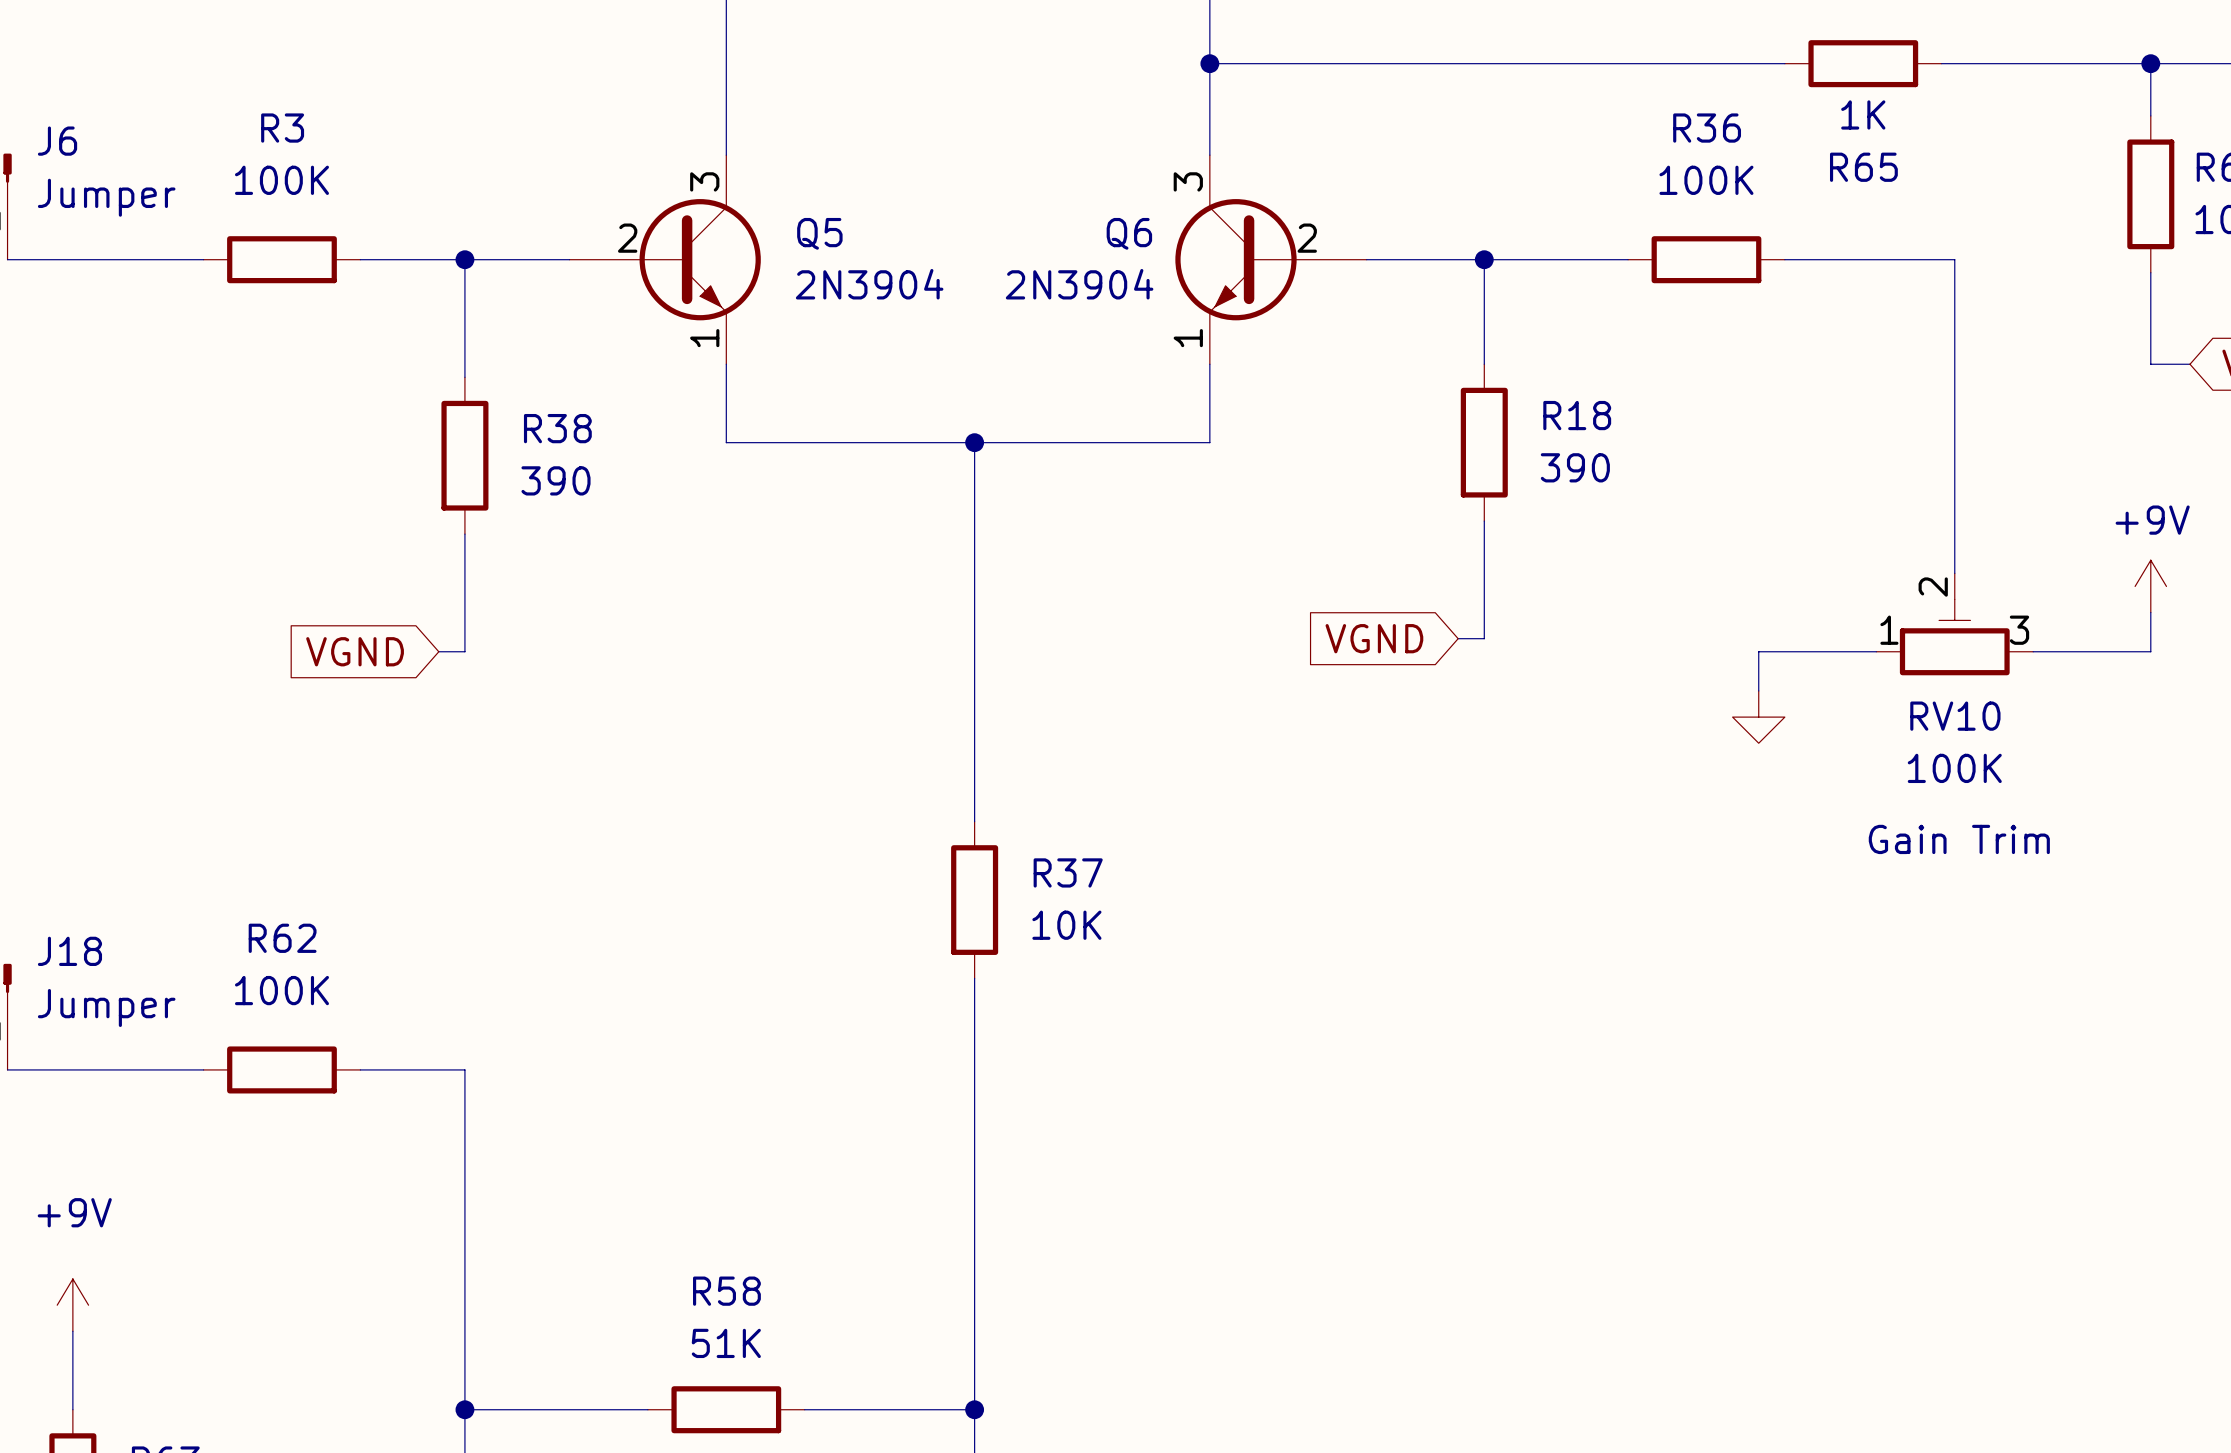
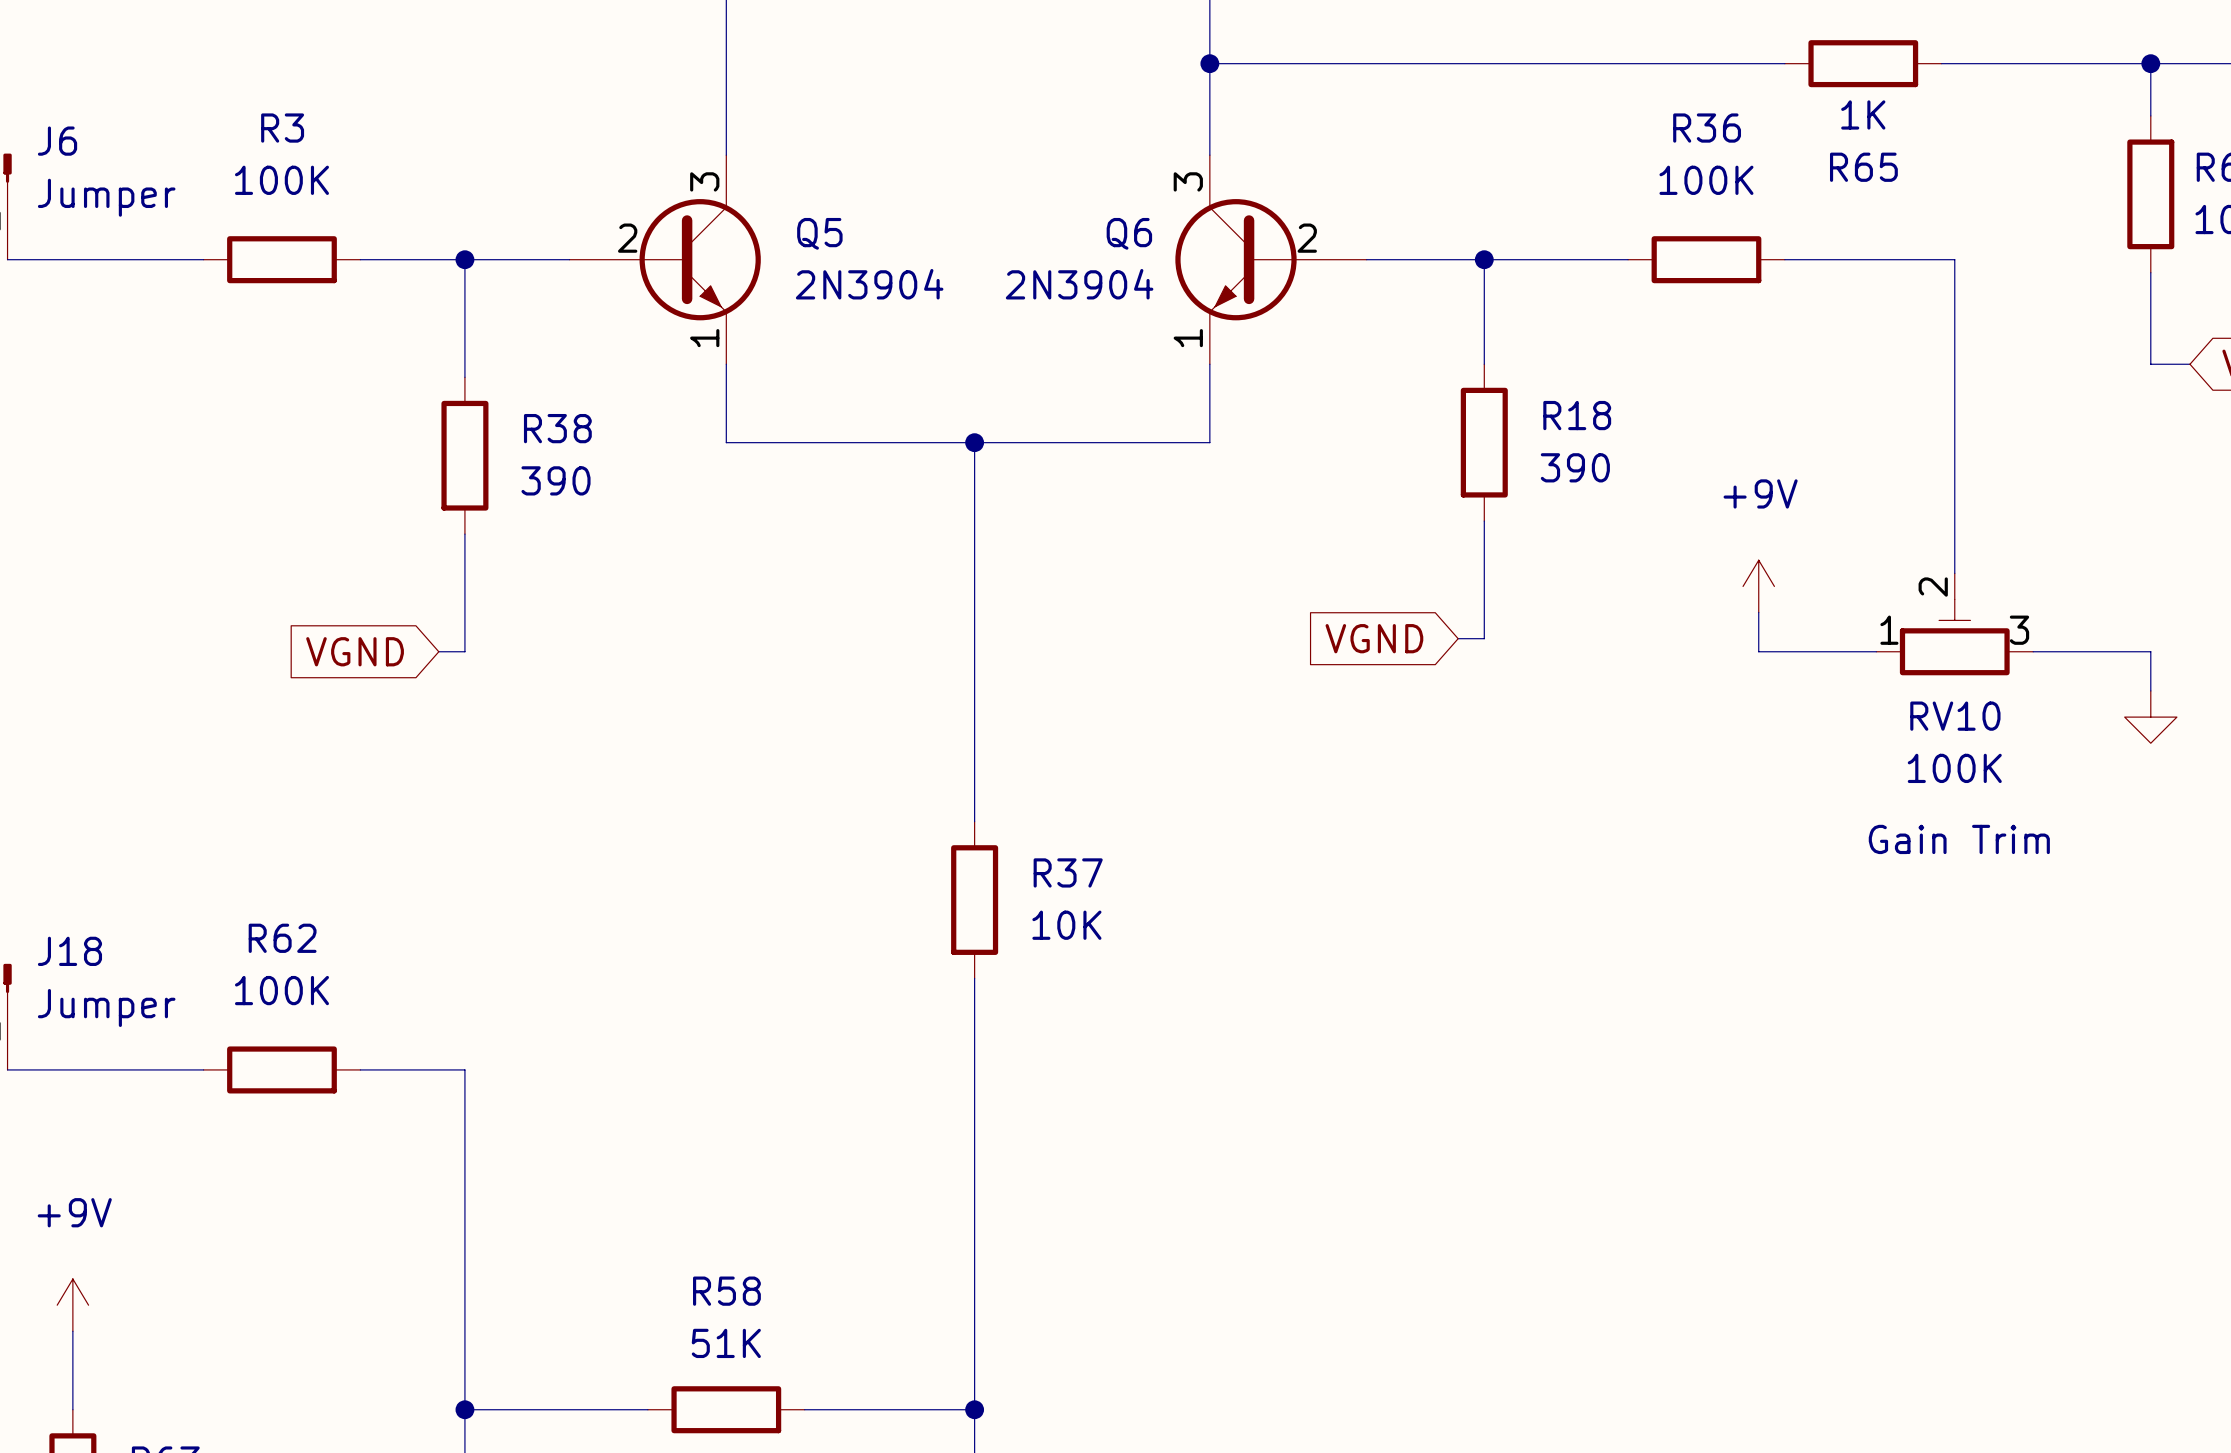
power symbol text position: +9V (2152, 520) -> +9V (1760, 493)
power symbol position: +9V (2150, 586) -> +9V (1758, 586)
wire: (2150, 612) (2150, 651) -> (2150, 690) (2150, 651)
wire: (1758, 651) (1758, 690) -> (1758, 651) (1758, 612)
power symbol position: (1758, 717) -> (2150, 717)

